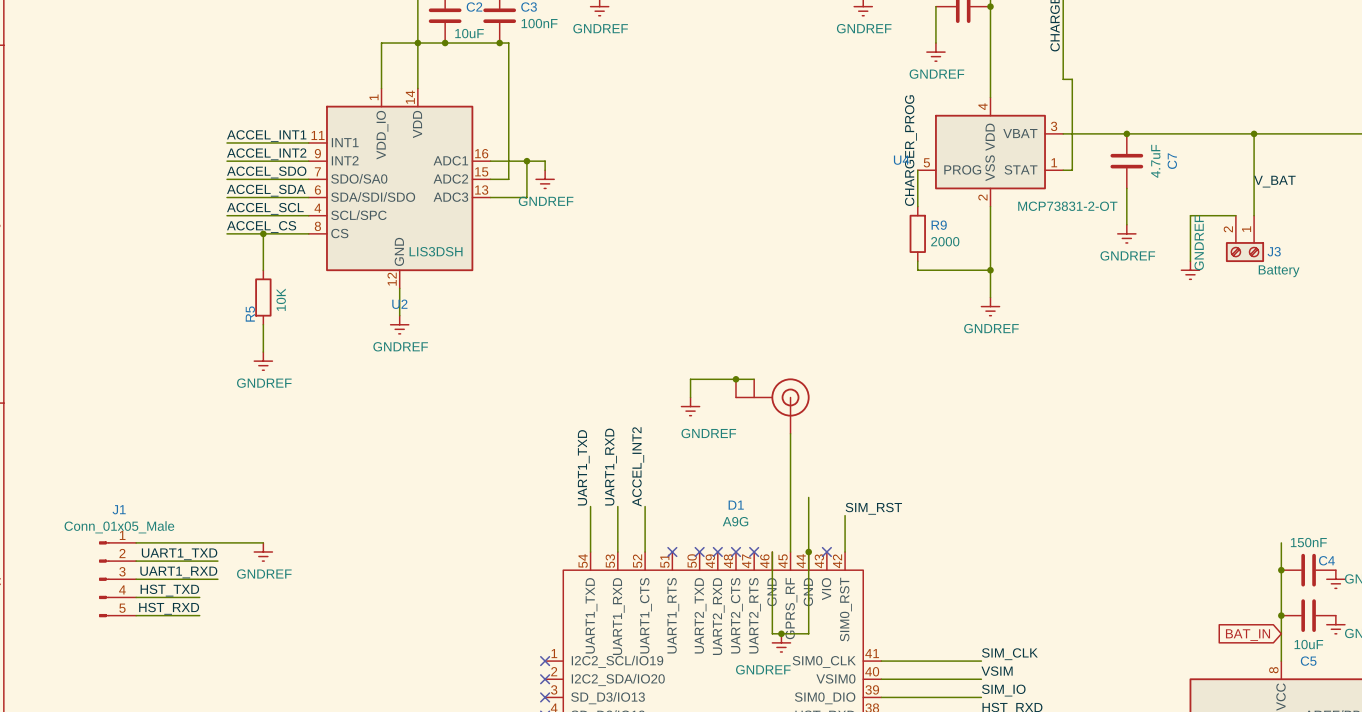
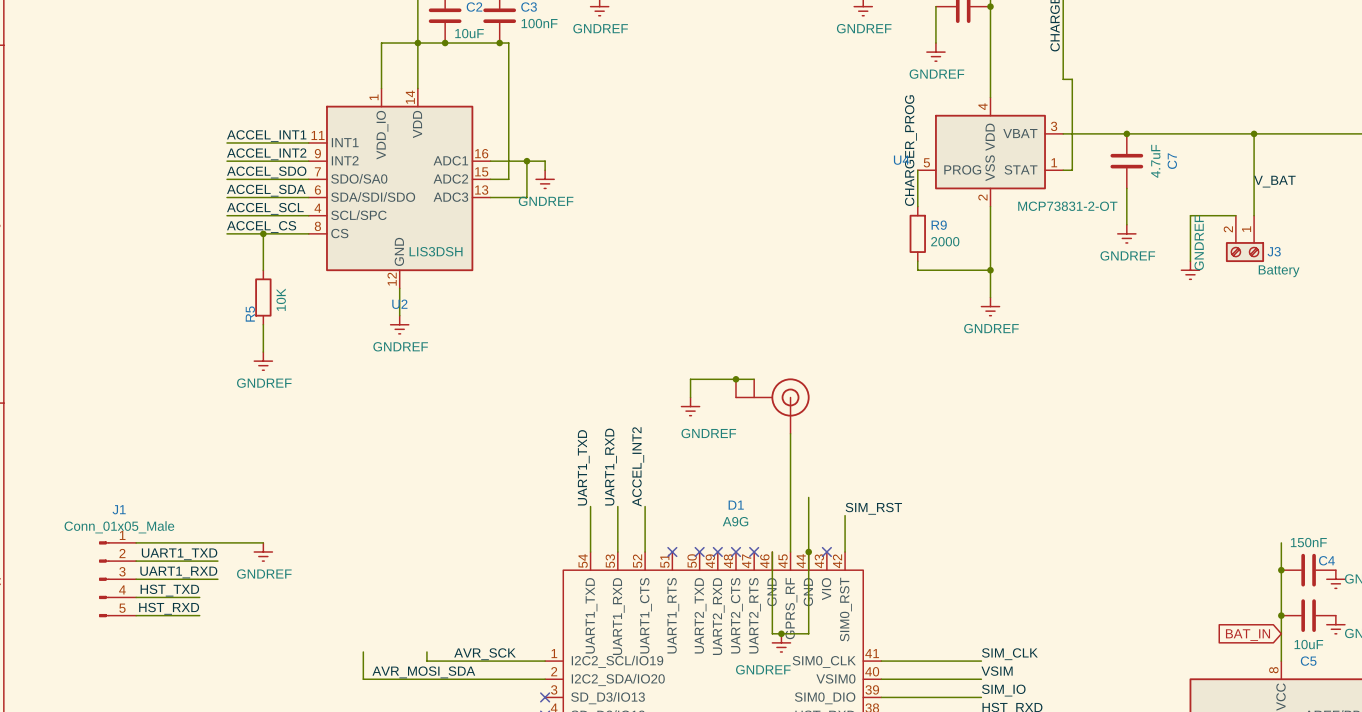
wire: none -> (363, 651) (363, 679) (545, 679)
wire: none -> (426, 651) (426, 661) (545, 661)
label: none -> AVR_SCK (485, 654)
no-connect mark: (545, 661) -> none
label: none -> AVR_MOSI_SDA (423, 672)
no-connect mark: (545, 679) -> none

